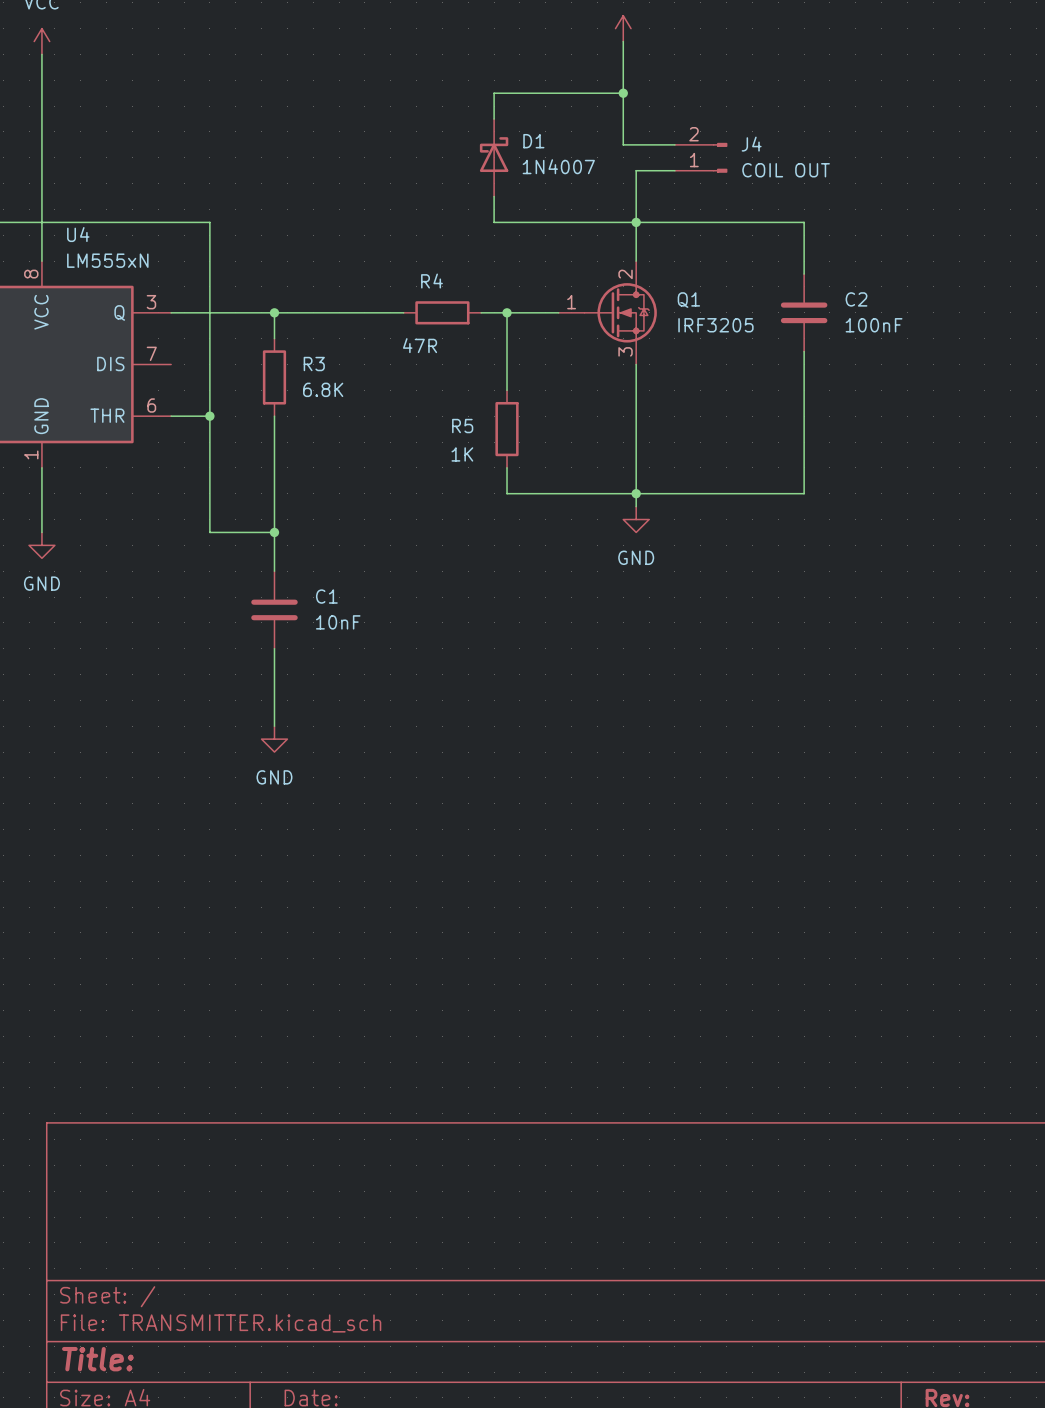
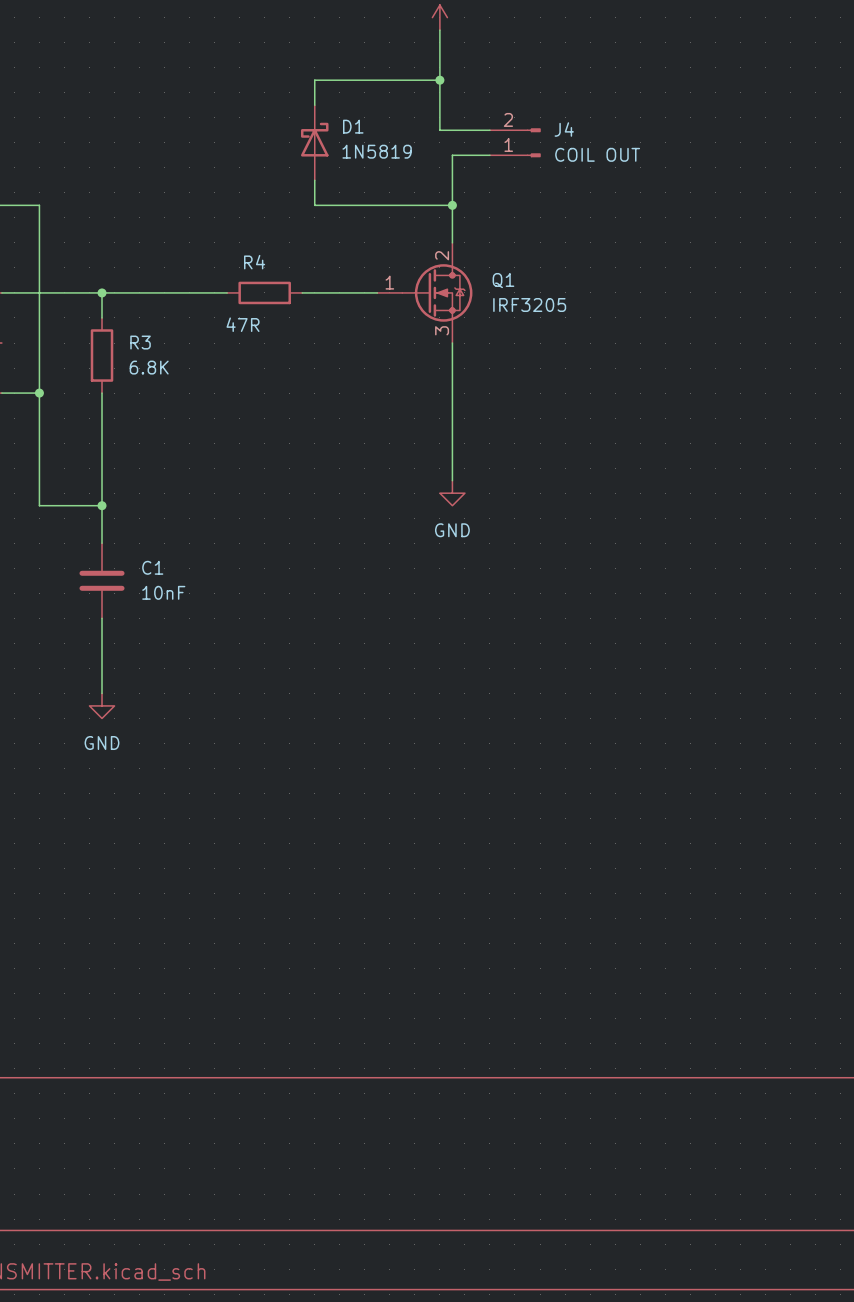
D1 value: 1N4007 (558, 166) -> 1N5819 (377, 151)
wire: (636, 222) (804, 222) (804, 274) -> none
wire: (507, 312) (507, 390) -> none
junction: (507, 312) -> none
C2: 100nF (804, 312) -> none
wire: (804, 351) (804, 493) (507, 493) (507, 467) -> none
R5: 1K (507, 429) -> none
junction: (636, 493) -> none

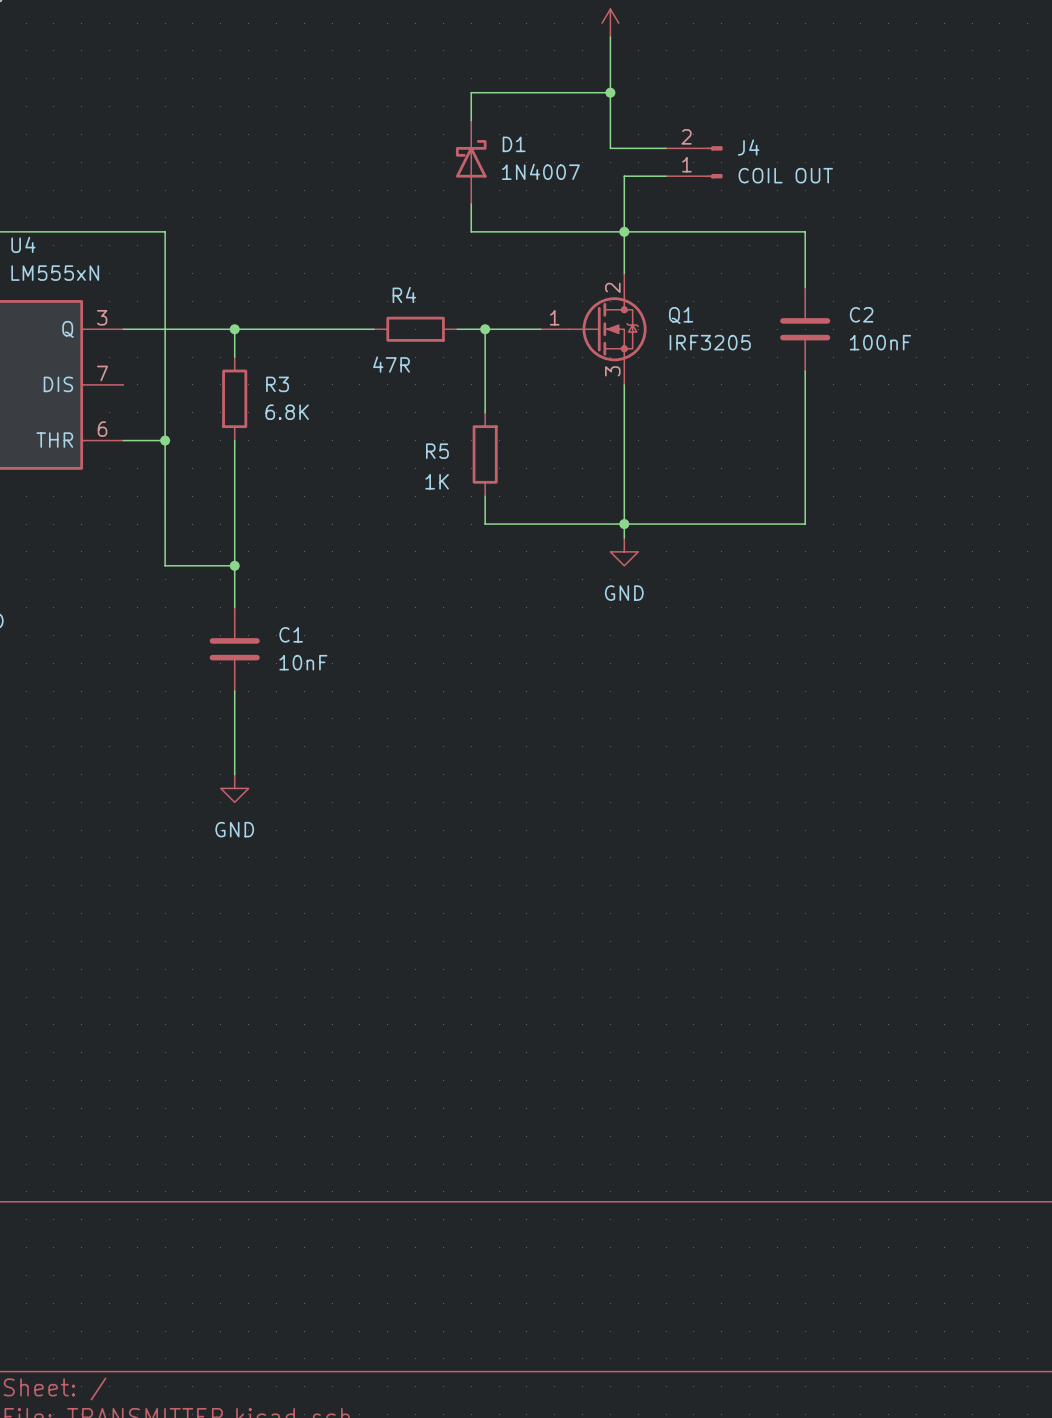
D1 value: 1N5819 (377, 151) -> 1N4007 (540, 171)
wire: none -> (624, 231) (805, 231) (805, 287)
wire: none -> (485, 329) (485, 412)
junction: none -> (485, 329)
C2: none -> 100nF (805, 329)
wire: none -> (805, 371) (805, 524) (485, 524) (485, 496)
R5: none -> 1K (485, 454)
junction: none -> (624, 524)

